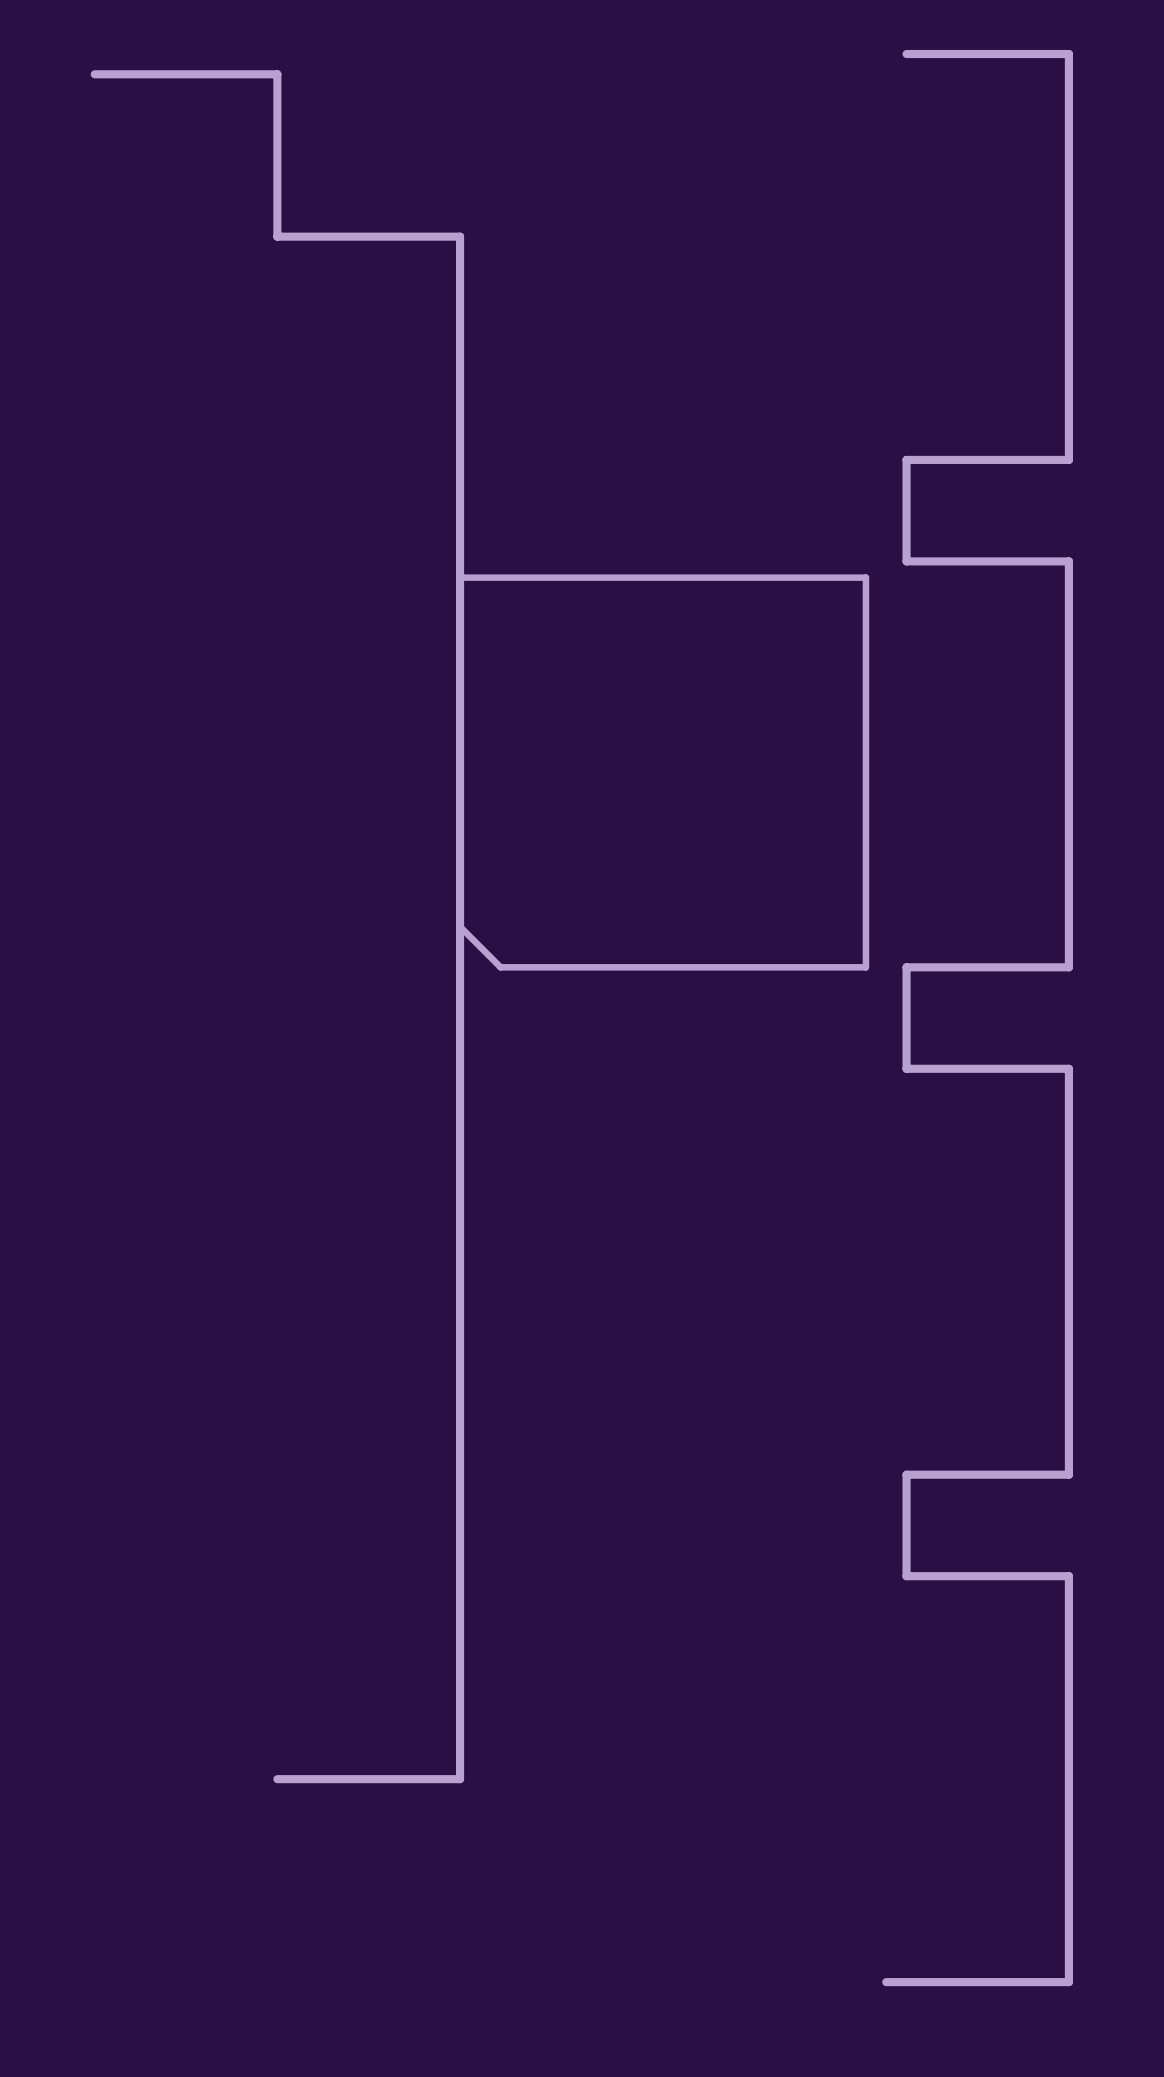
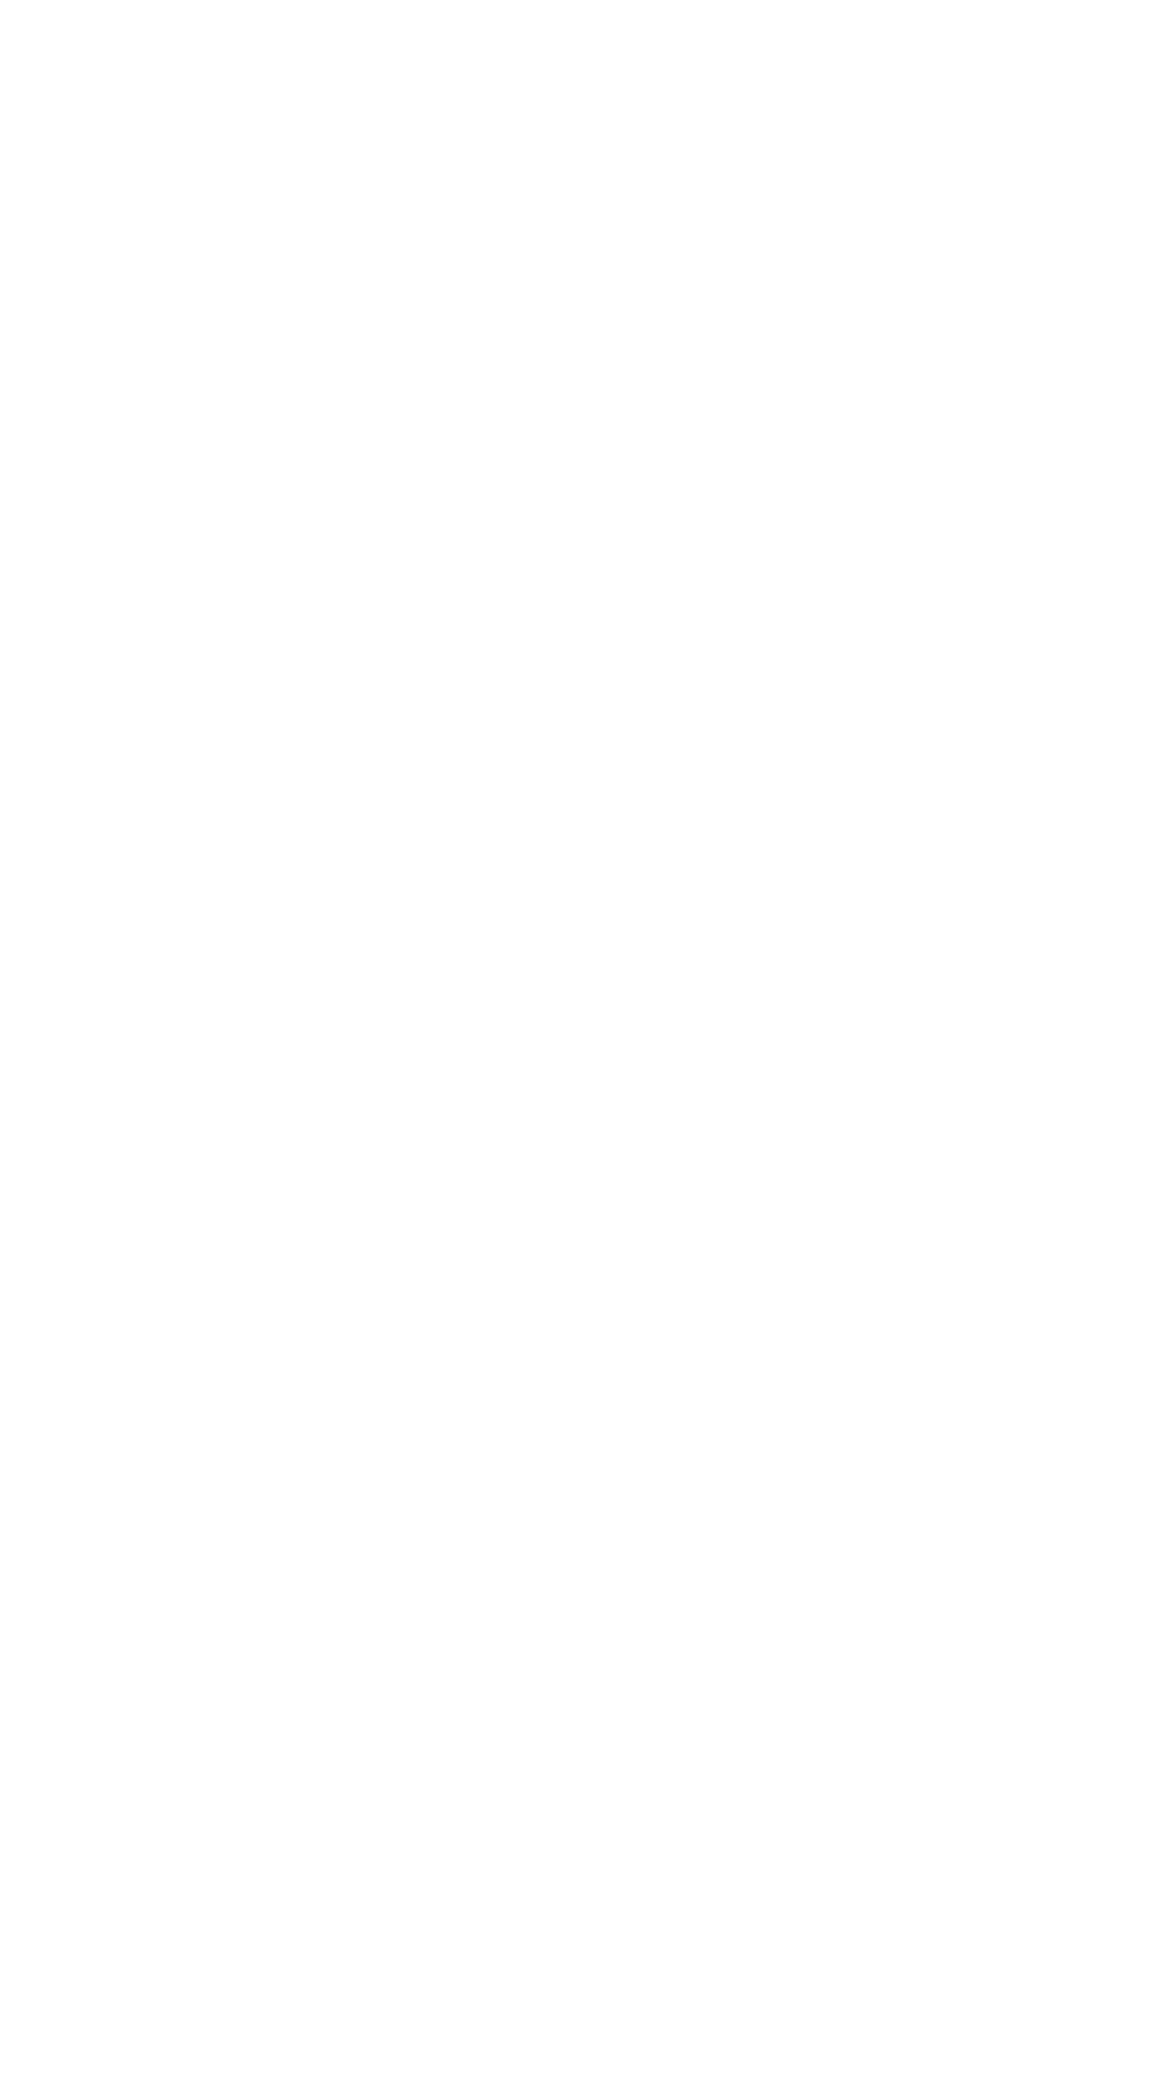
line: (906, 54) (1068, 54) (1068, 459) (906, 459) (906, 561) (1068, 561) (1068, 967) (906, 967) (906, 1068) (1068, 1068) (1068, 1474) (906, 1474) (906, 1576) (1068, 1576) (1068, 1982) (886, 1982) -> none
line: (94, 74) (277, 74) (277, 236) (460, 236) (460, 1779) (277, 1779) -> none
line: (460, 577) (865, 577) (865, 967) (500, 967) (460, 926) -> none

